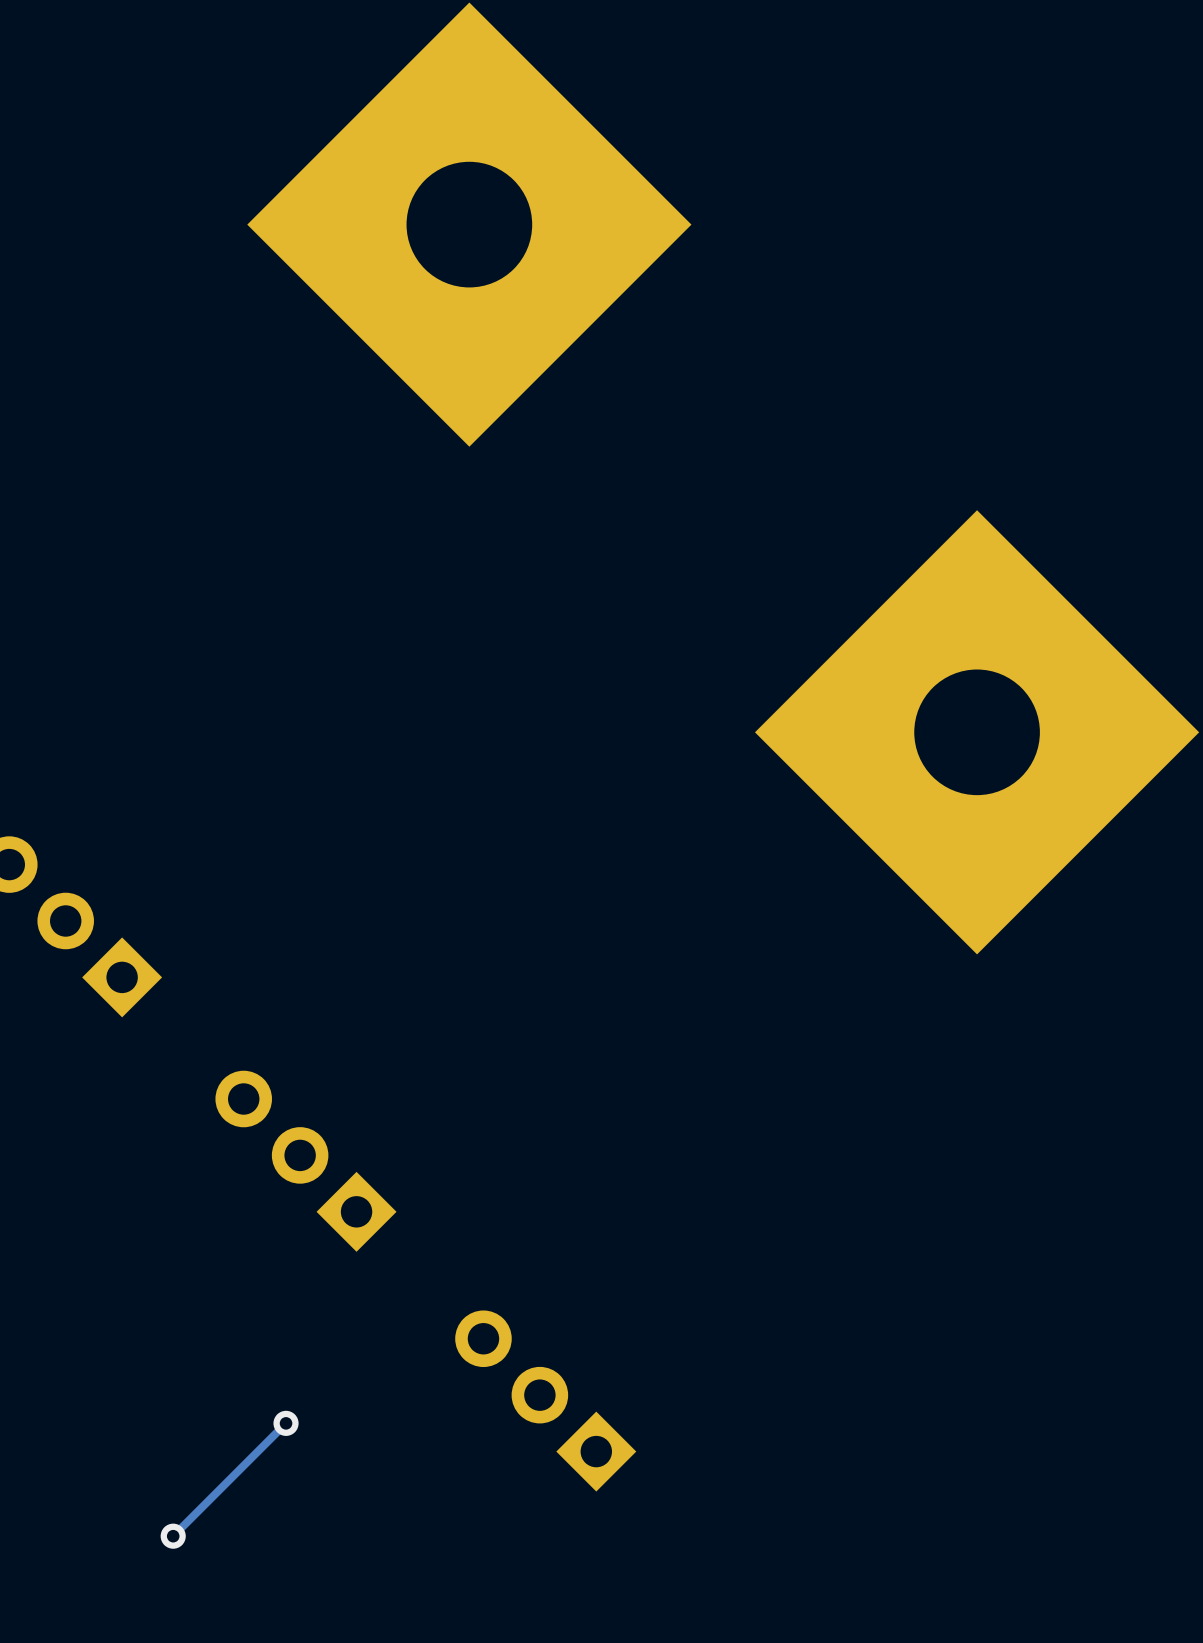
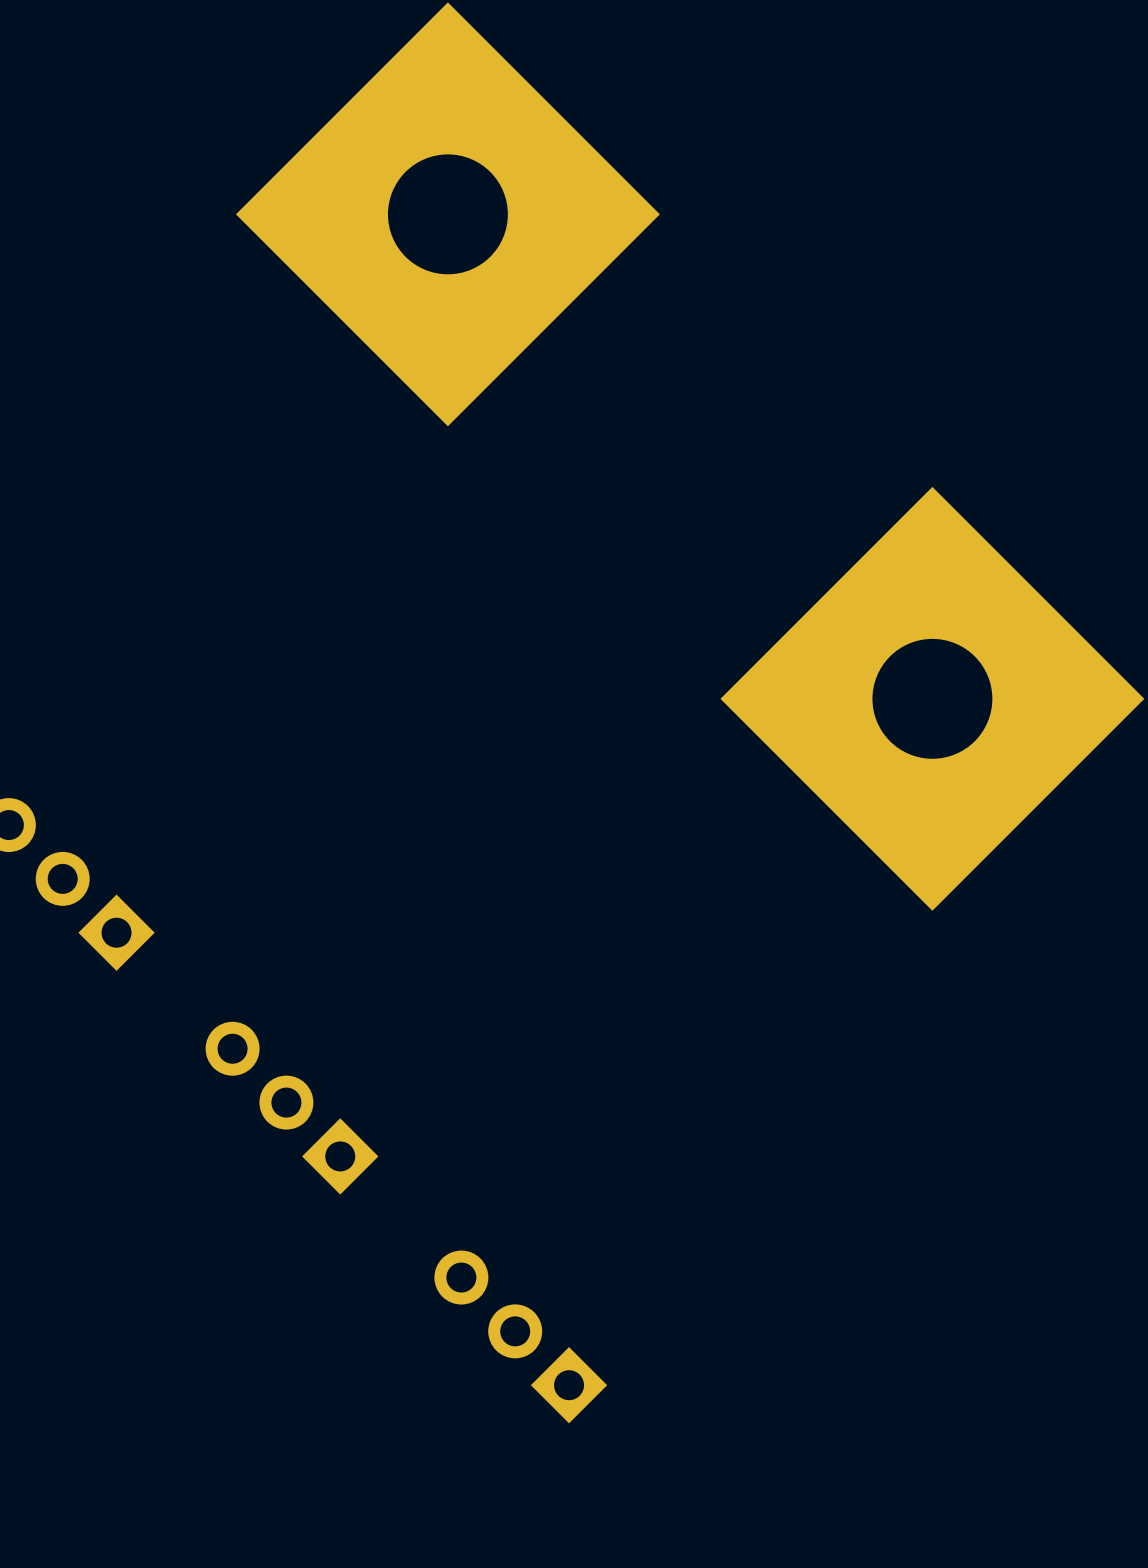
track: (286, 1423) (173, 1536) -> none
via: (286, 1423) -> none
via: (173, 1536) -> none

